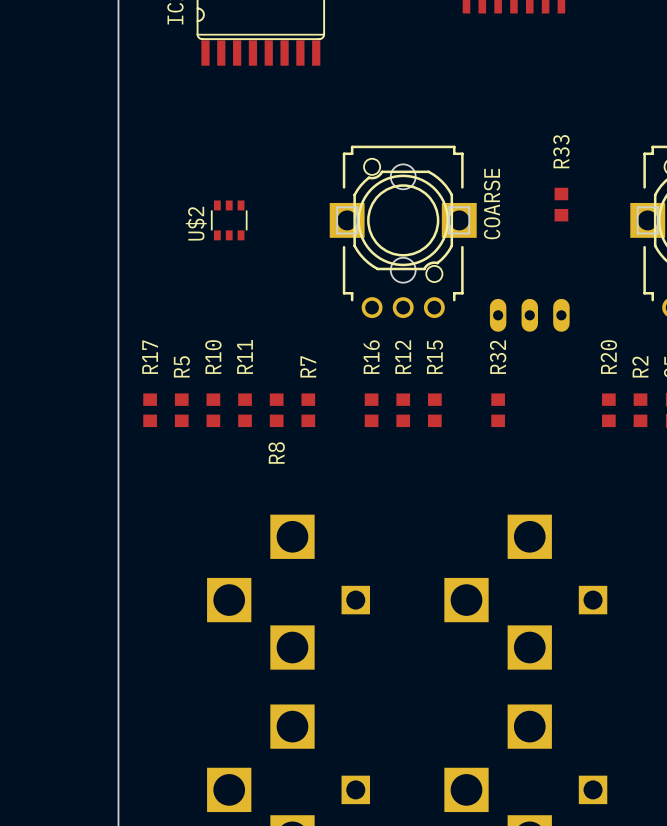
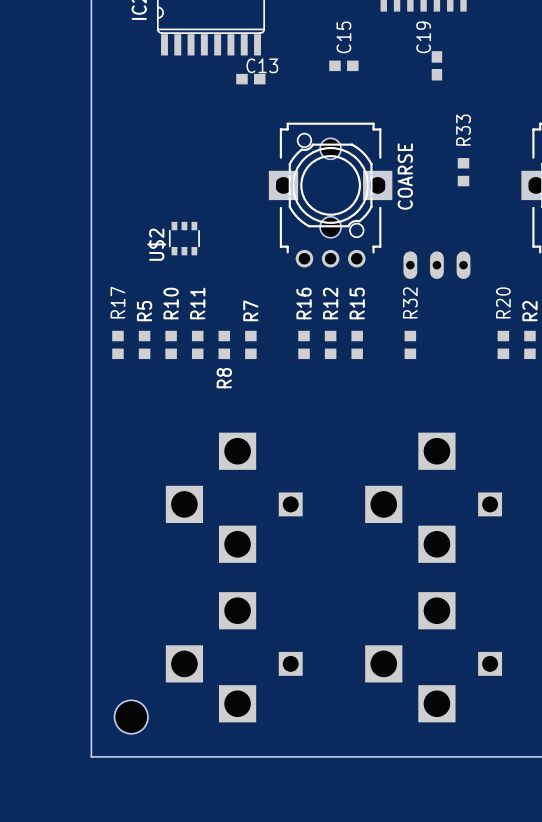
C15: none -> (343, 65)
C19: none -> (436, 65)
C13: none -> (250, 79)
U$2 position: (229, 220) -> (184, 238)

